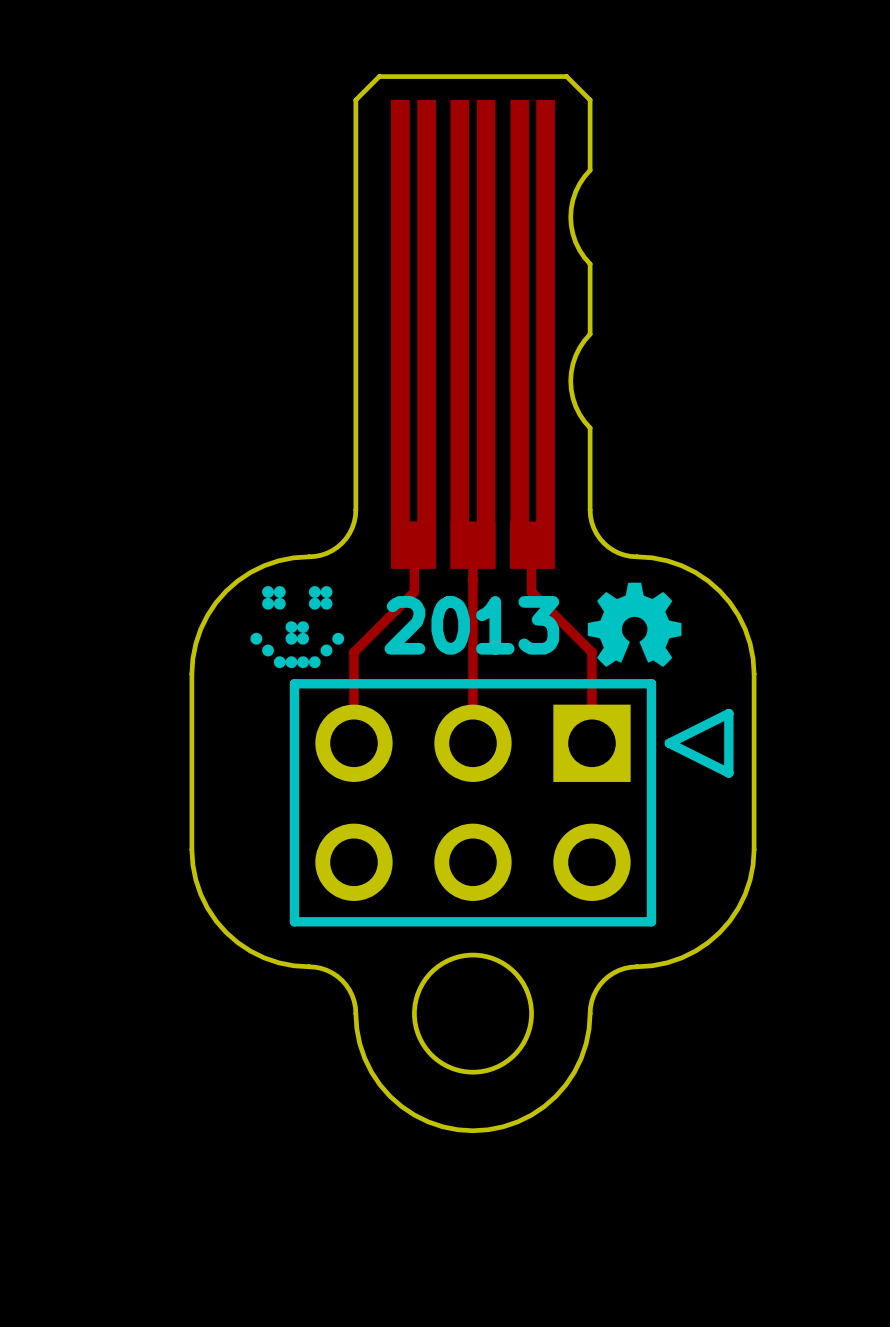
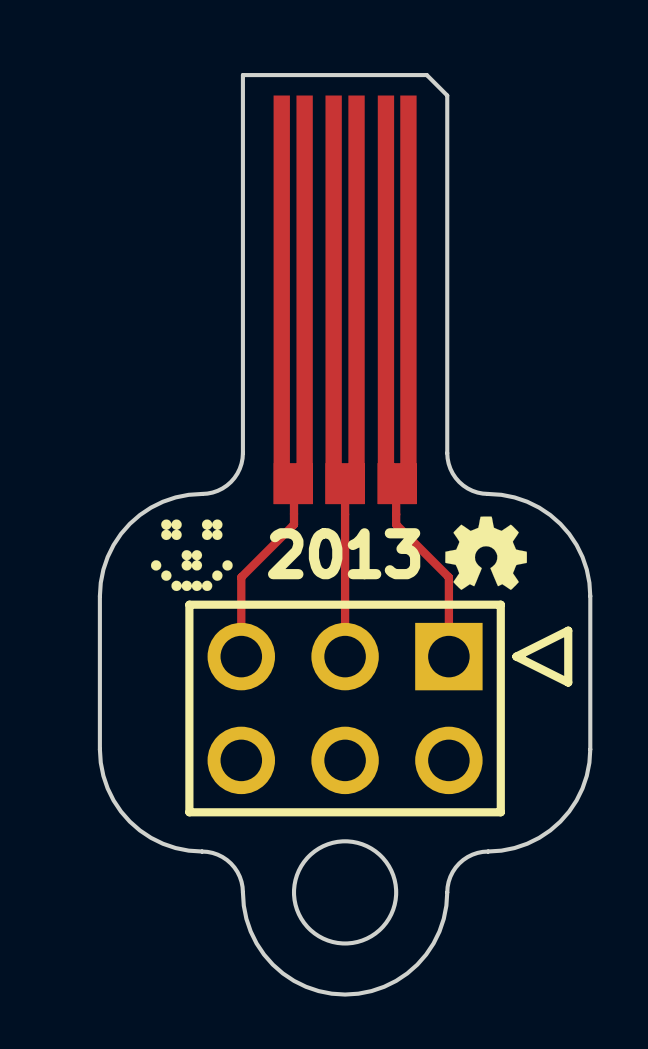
board edge: (379, 76) (355, 100) -> (263, 75) (242, 75) (242, 95)
board edge: (590, 170) (575, 191) (570, 217) (575, 242) (590, 263) -> (447, 156) (447, 238)
board edge: (590, 334) (575, 355) (570, 381) (575, 406) (590, 427) -> (447, 299) (447, 381)

